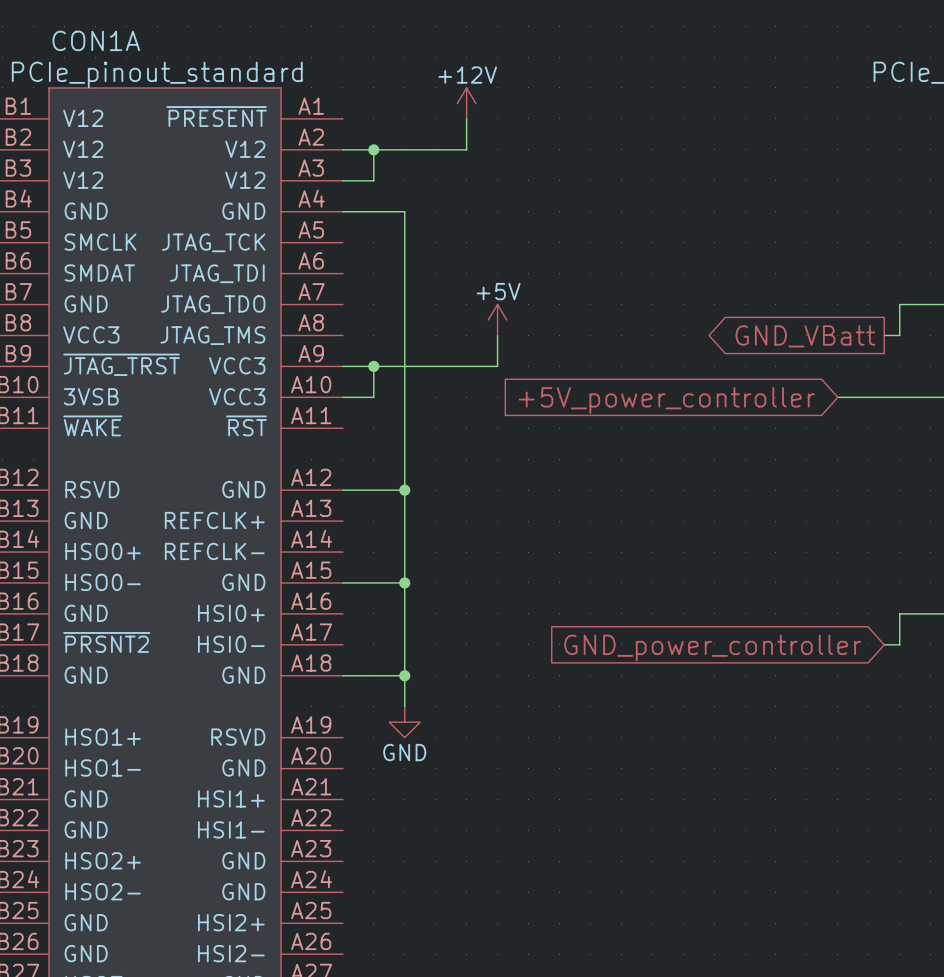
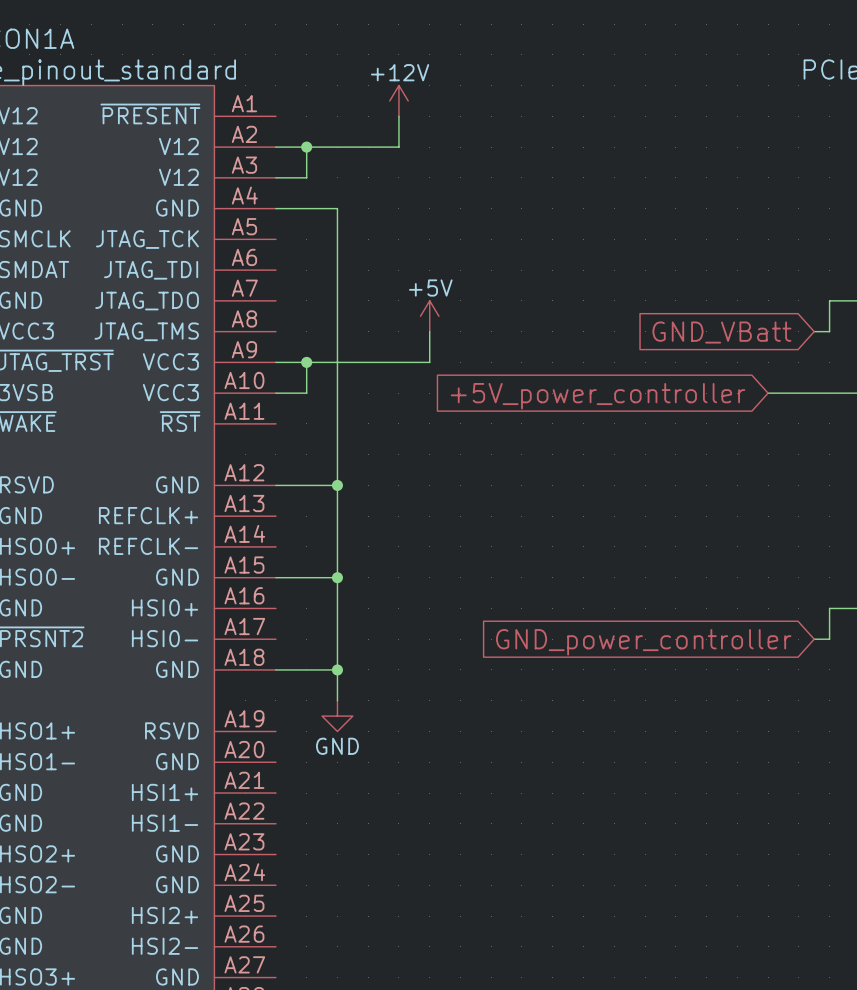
global label shape: output (805, 336) -> input (721, 332)

